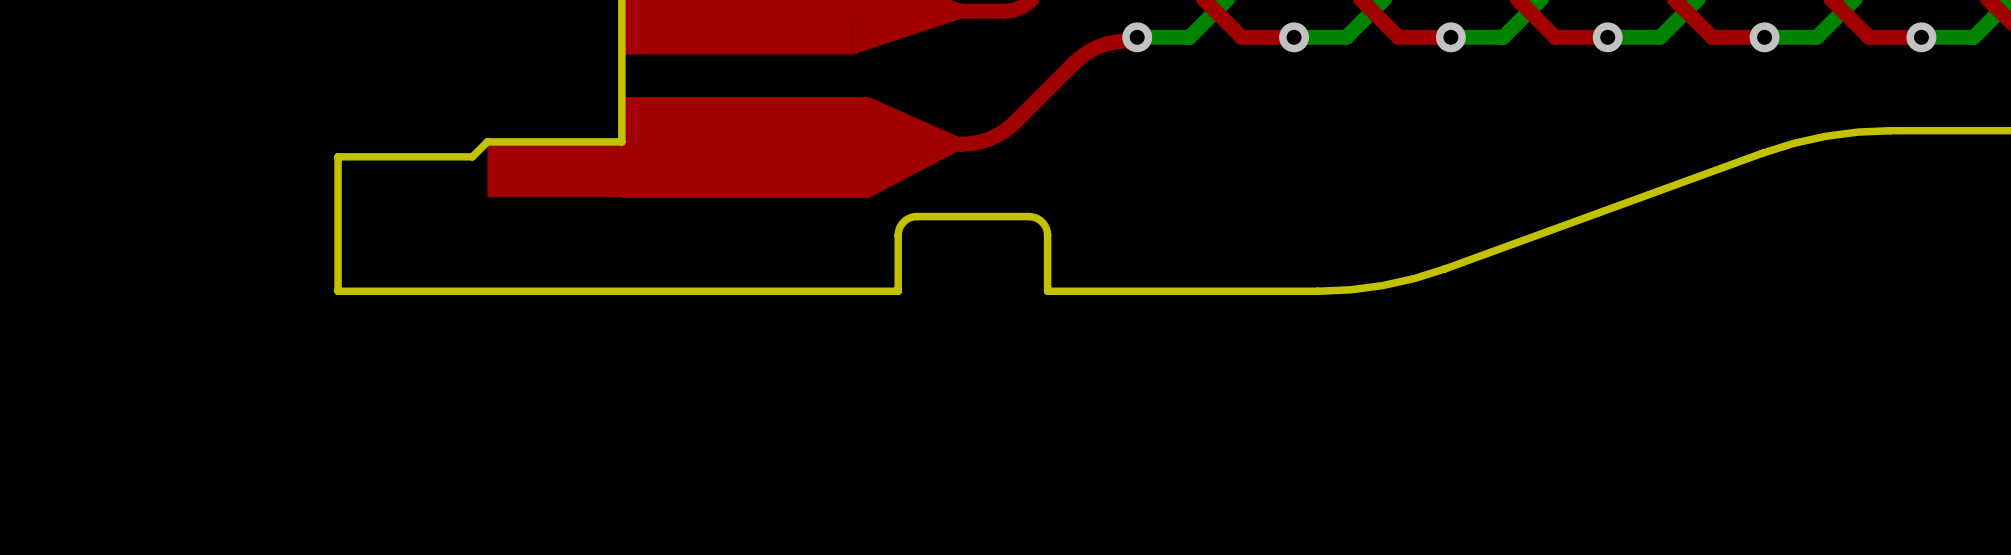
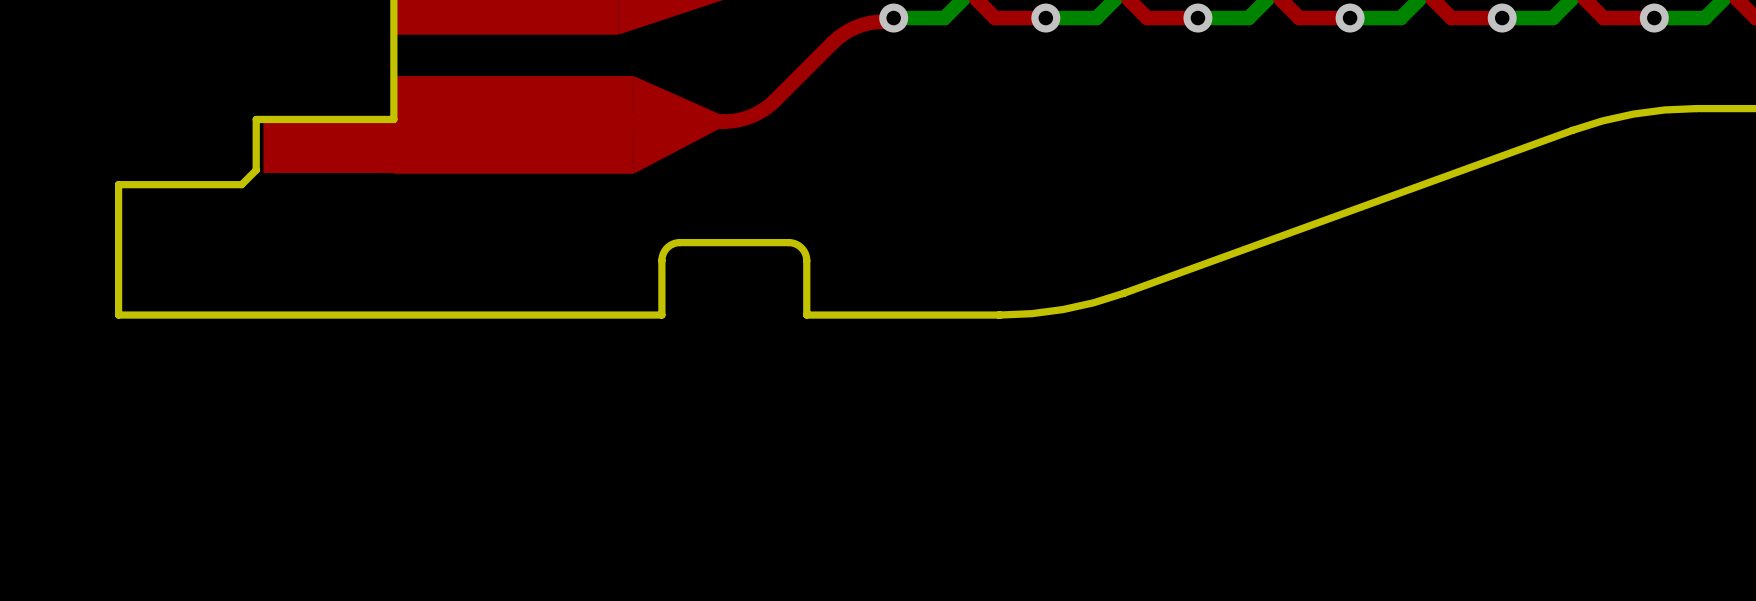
board edge: (1964, 130) (1857, 132) (1793, 143) (1445, 268) (1382, 285) (1317, 291) (1047, 291) -> (1696, 108) (1633, 114) (1572, 130) (1123, 293) (1062, 309) (1000, 315) (806, 315) (806, 264)
board edge: (487, 141) (472, 156) (338, 156) (338, 209) -> (263, 119) (256, 119) (256, 170) (241, 184) (118, 184)
board edge: (898, 287) (898, 231) (905, 220) (916, 216) (1028, 216) (1037, 218) (1043, 223) (1047, 233) (1047, 287) -> (661, 260) (667, 247) (680, 242) (790, 242) (802, 249) (806, 260)
board edge: (338, 291) (898, 291) -> (118, 264) (118, 315) (661, 315) (661, 264)

